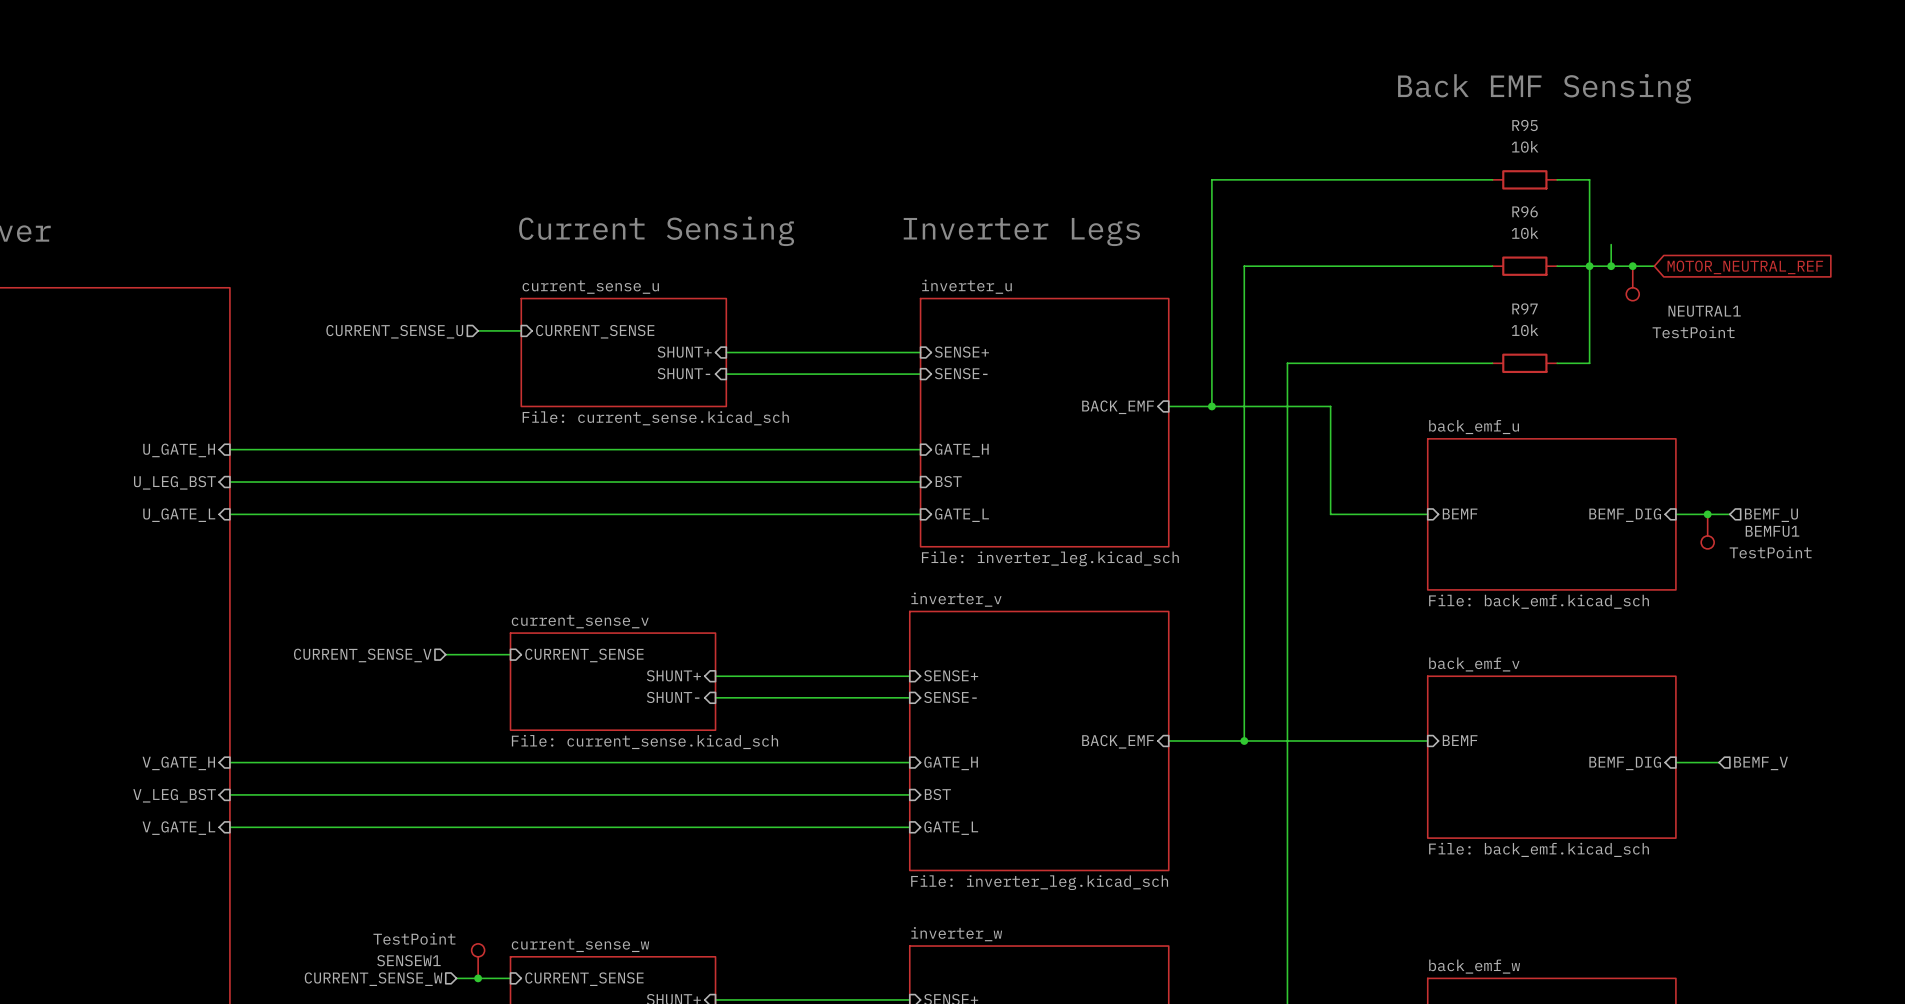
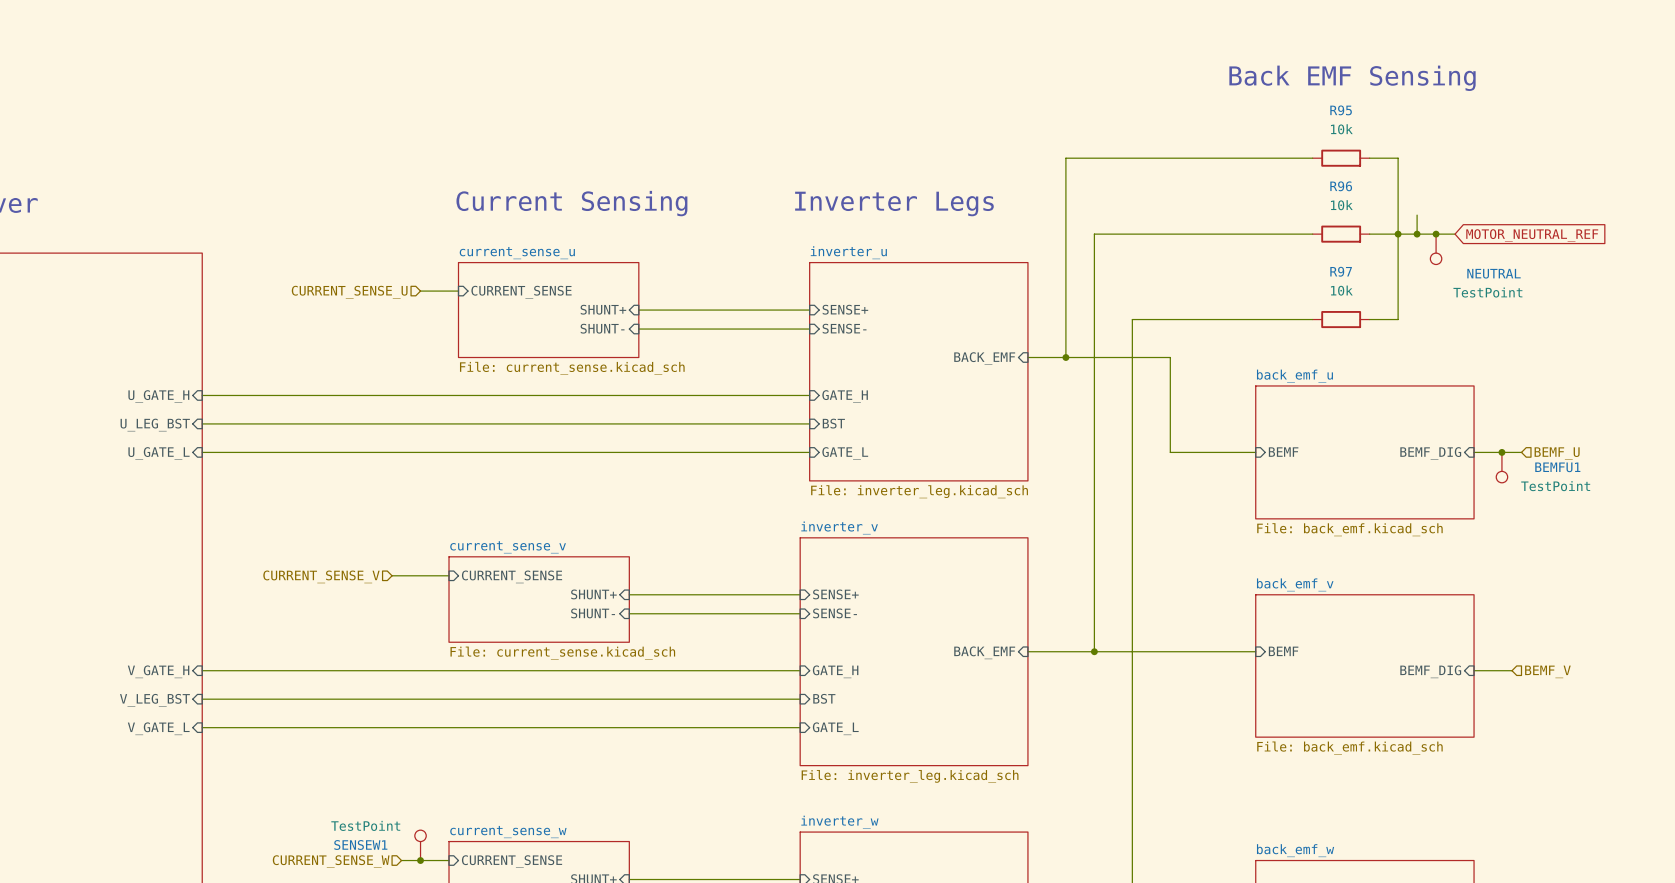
NEUTRAL1 name: NEUTRAL1 (1704, 311) -> NEUTRAL (1494, 273)

